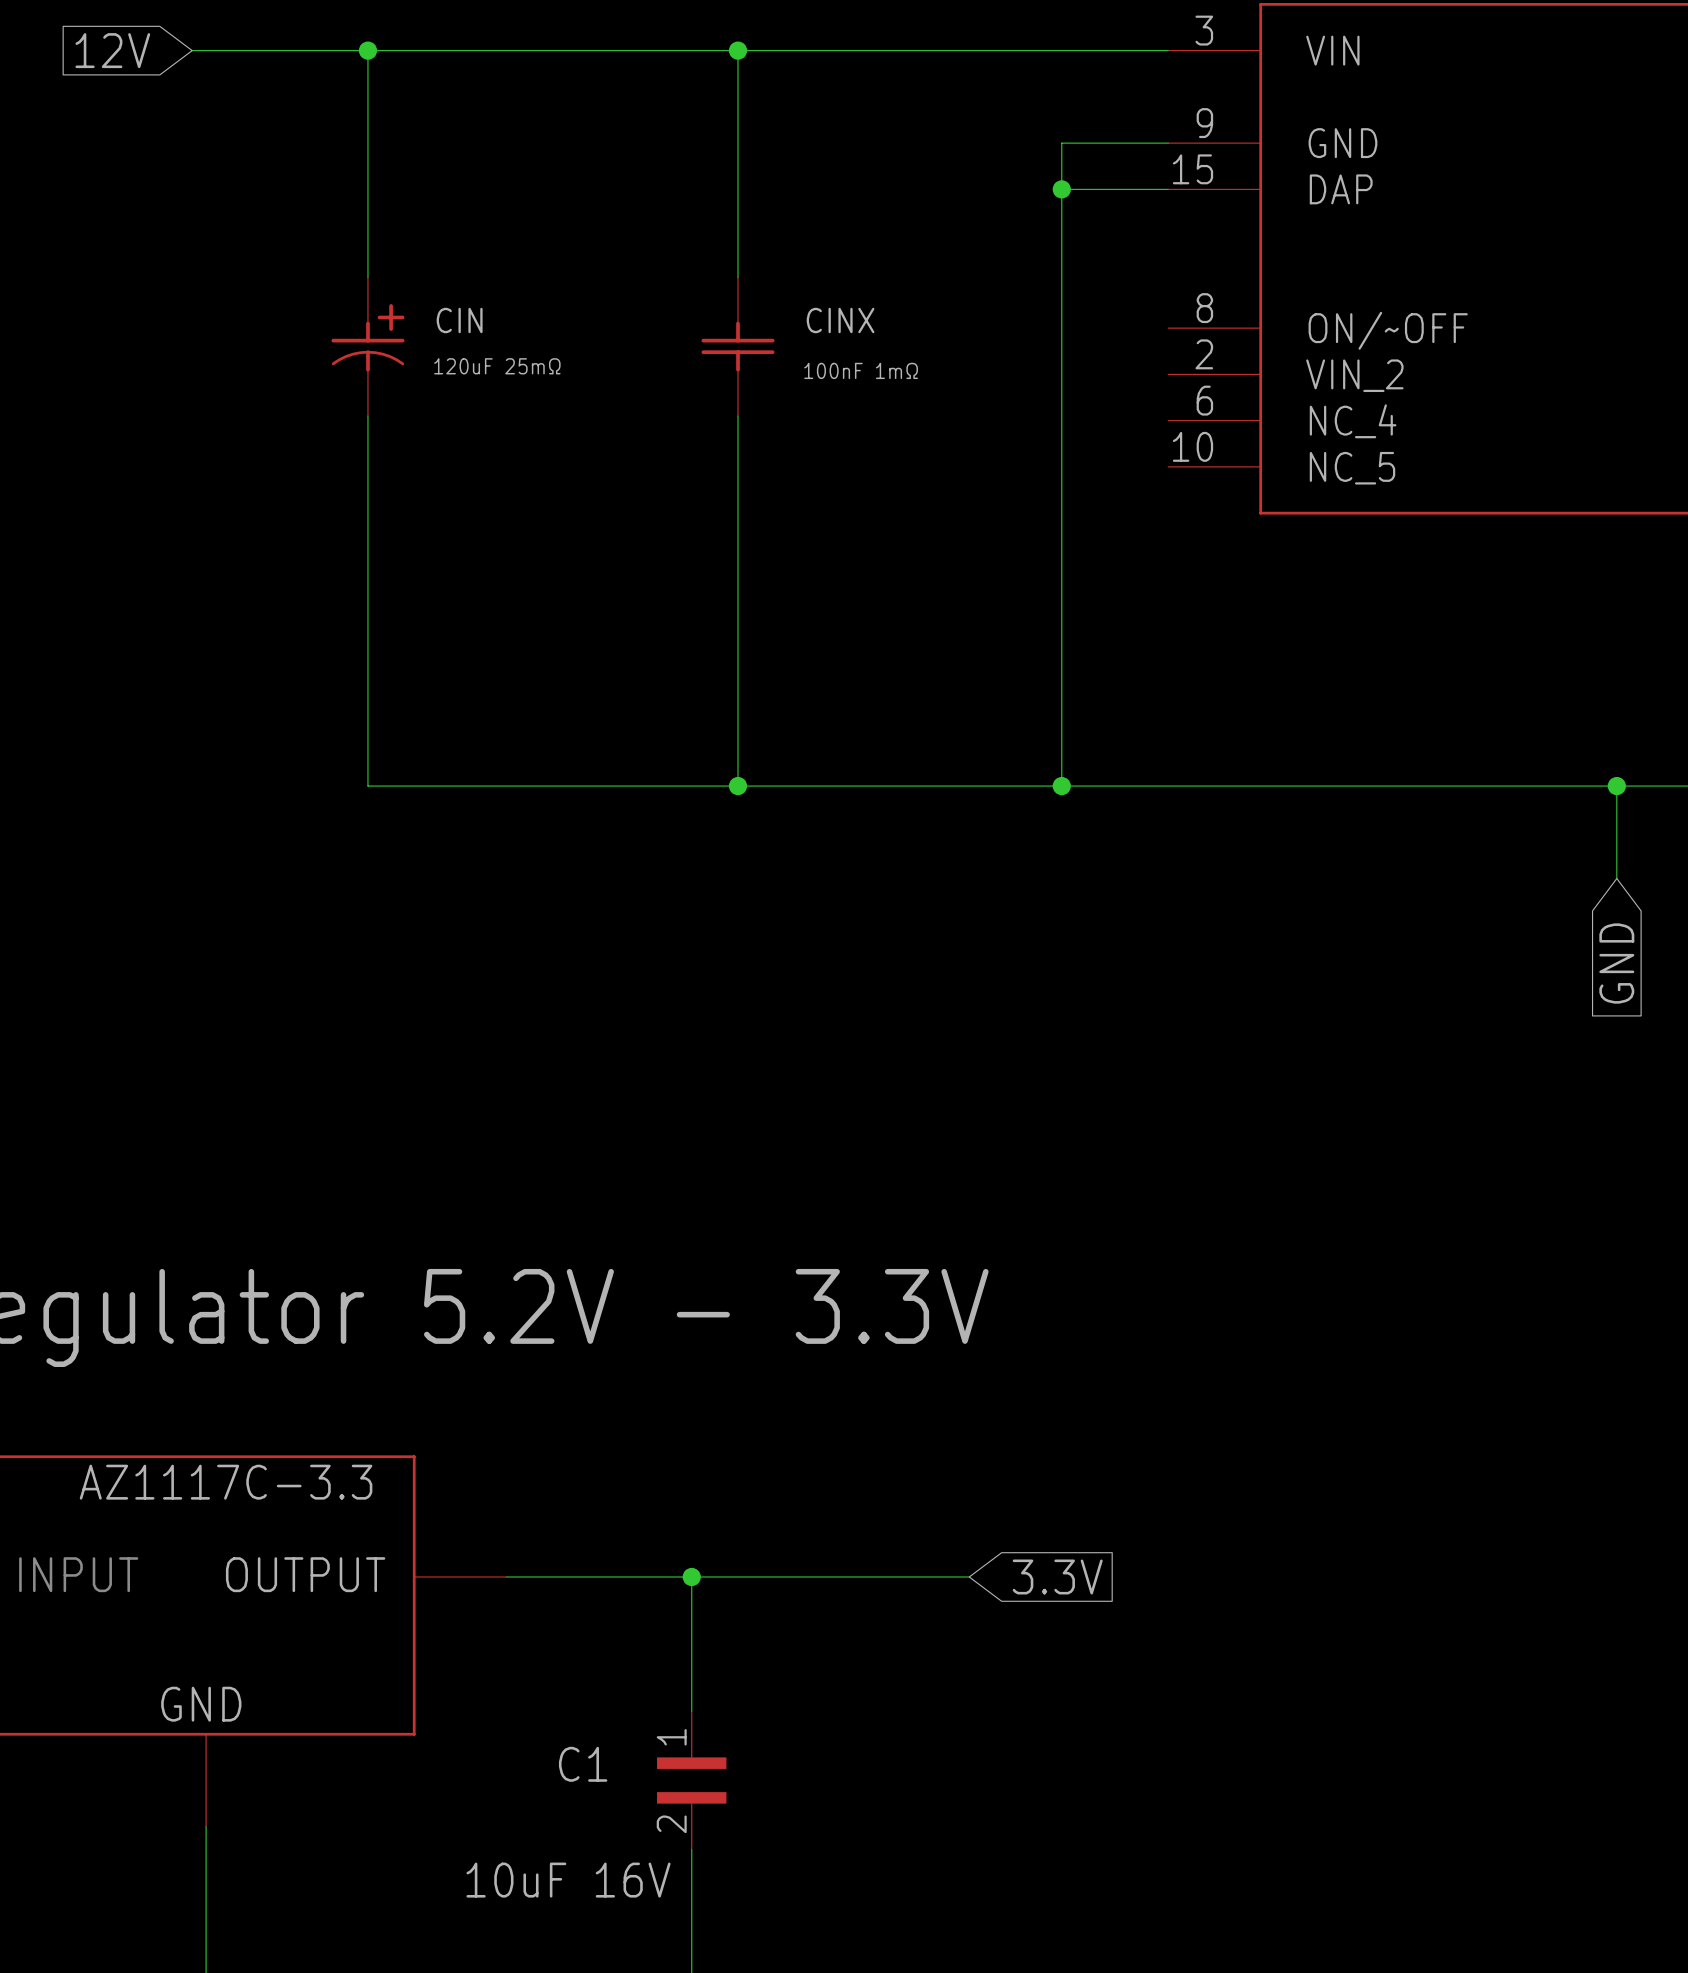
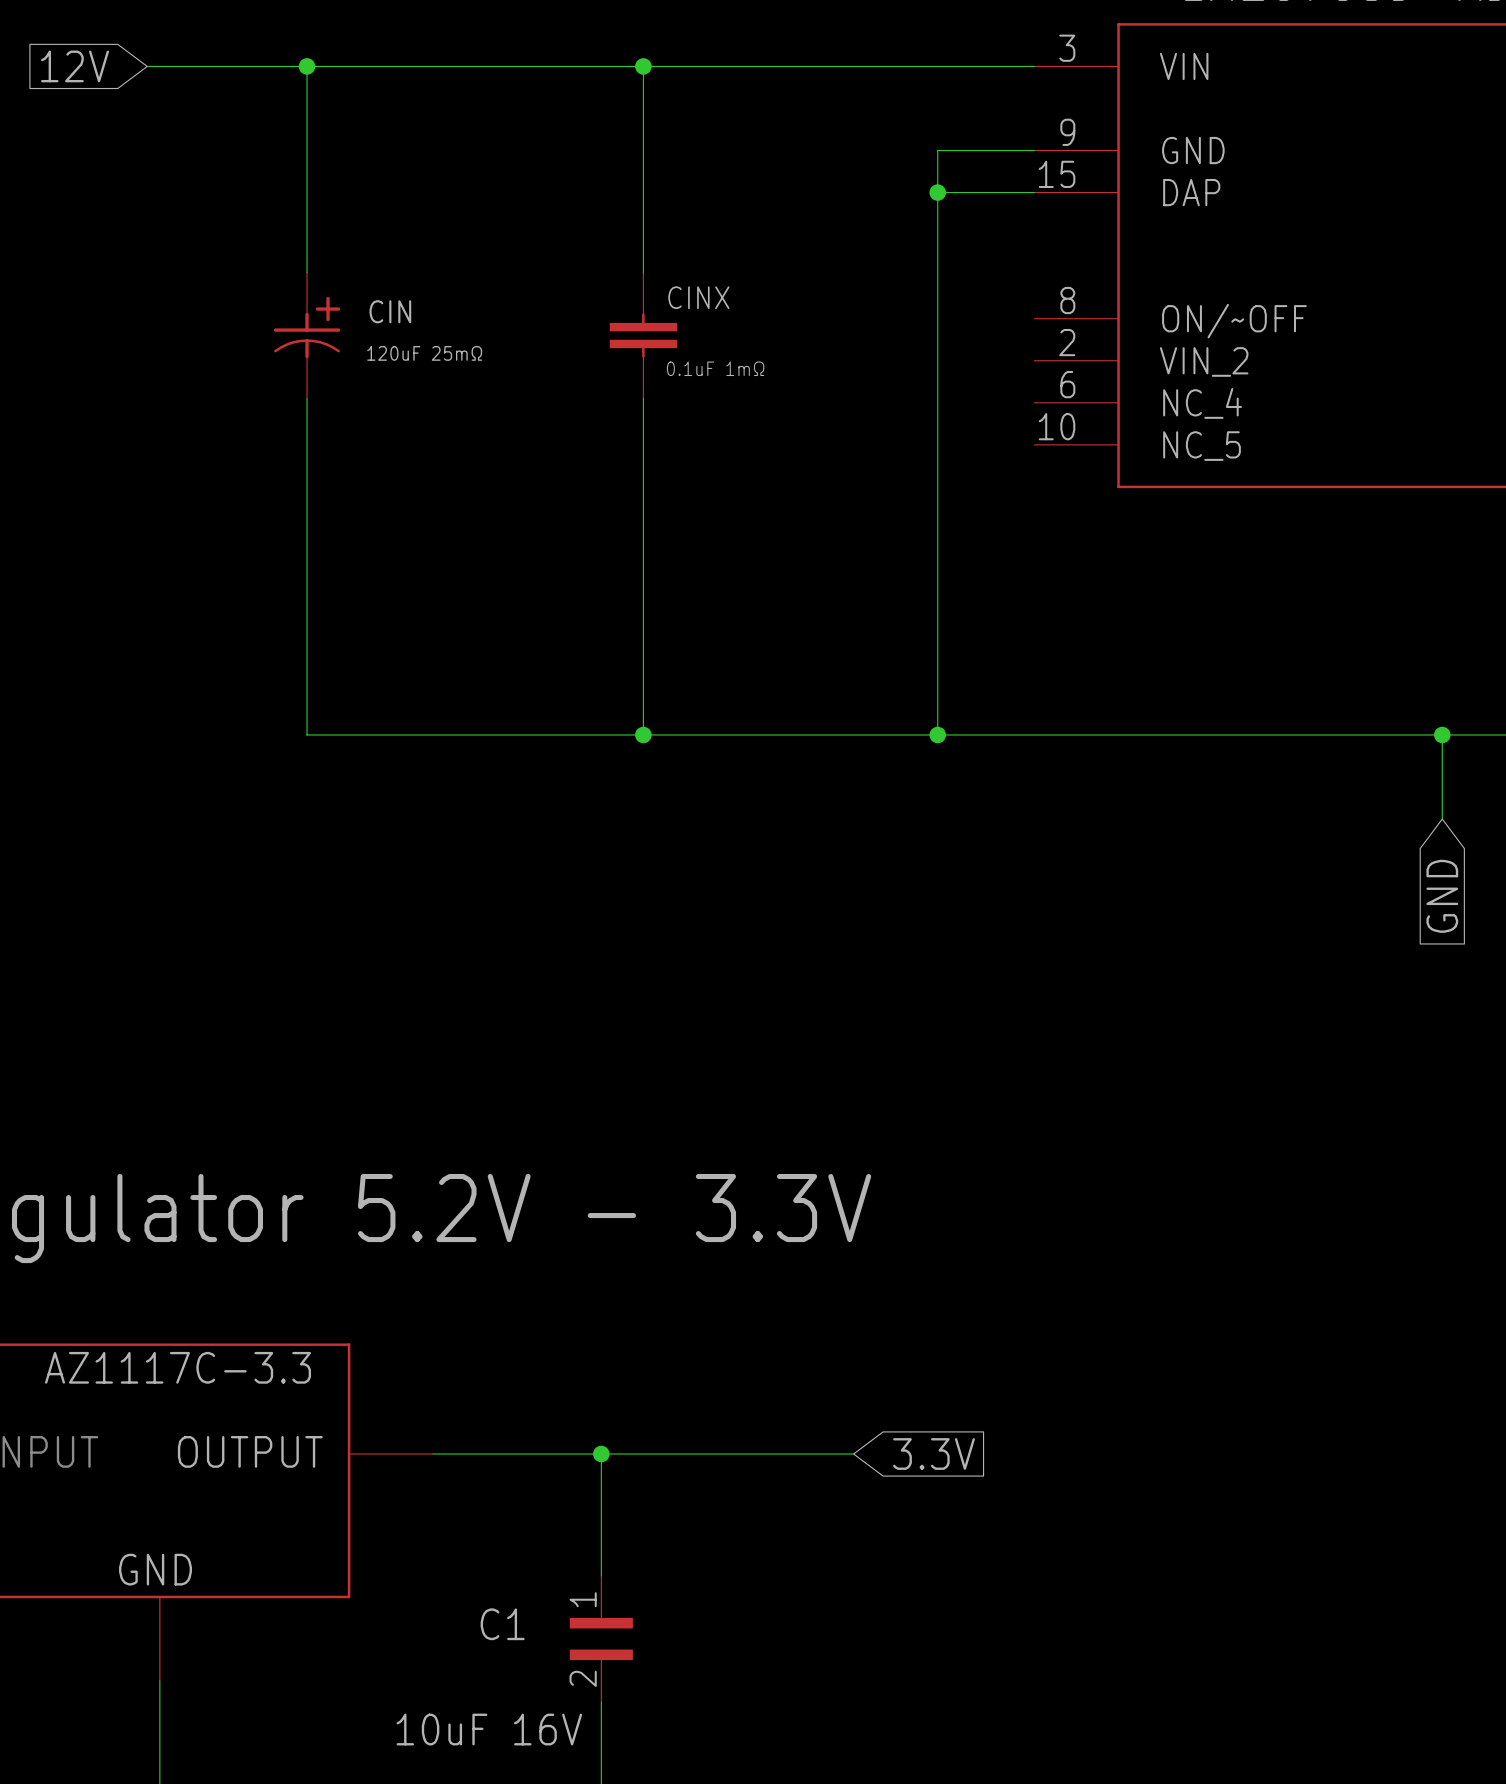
CINX symbol: [701, 277, 775, 417] -> [609, 272, 678, 399]
CINX name position: CINX (840, 320) -> CINX (698, 297)
CINX value: 100nF 1mΩ (861, 370) -> 0.1uF 1mΩ (715, 368)

